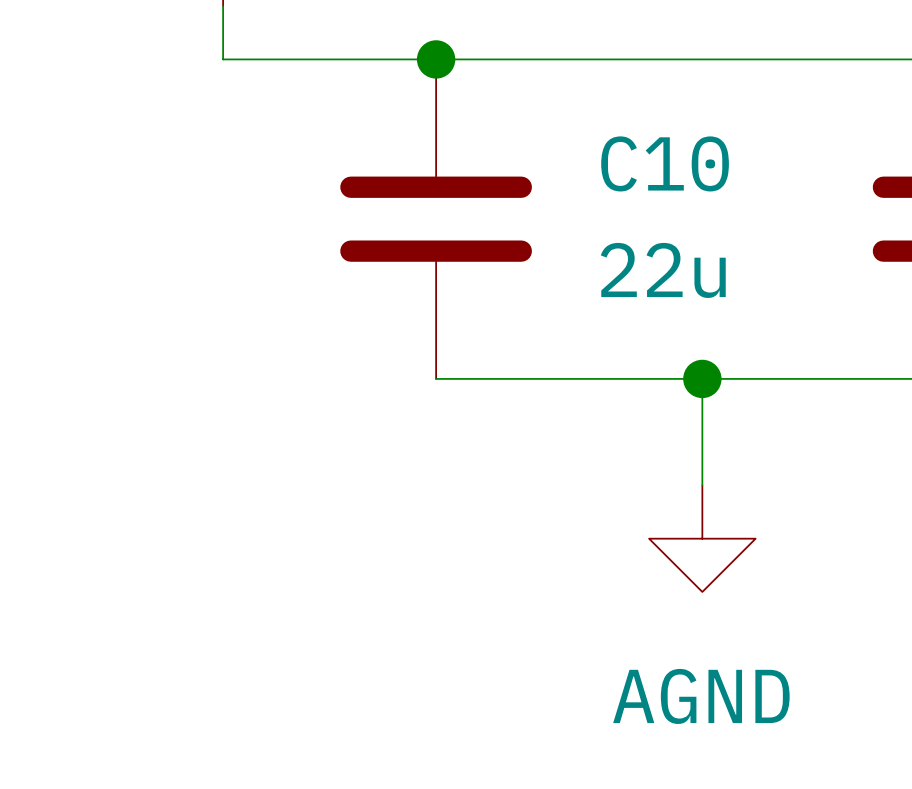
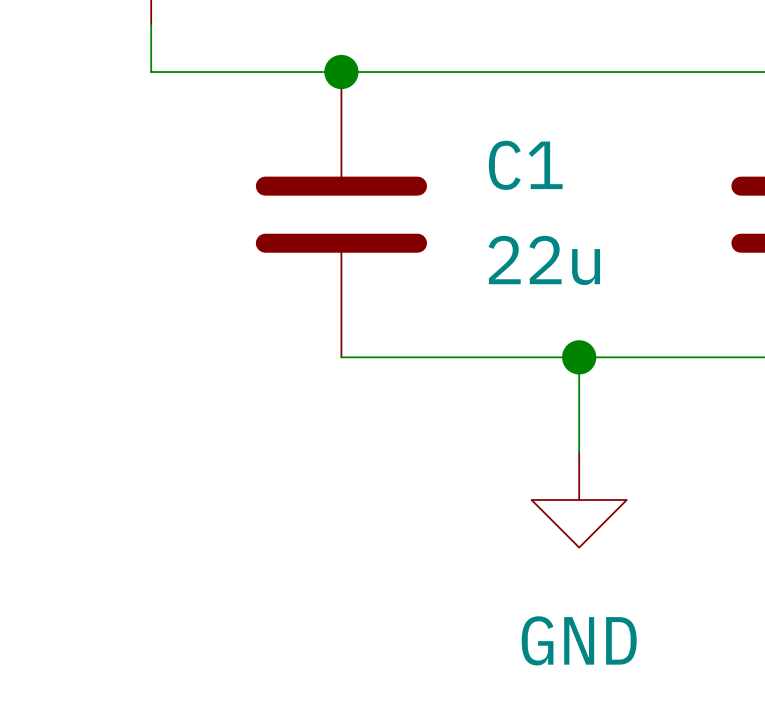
C10 name: C10 (665, 163) -> C1 (525, 165)
power symbol: AGND (702, 538) -> GND (579, 500)

